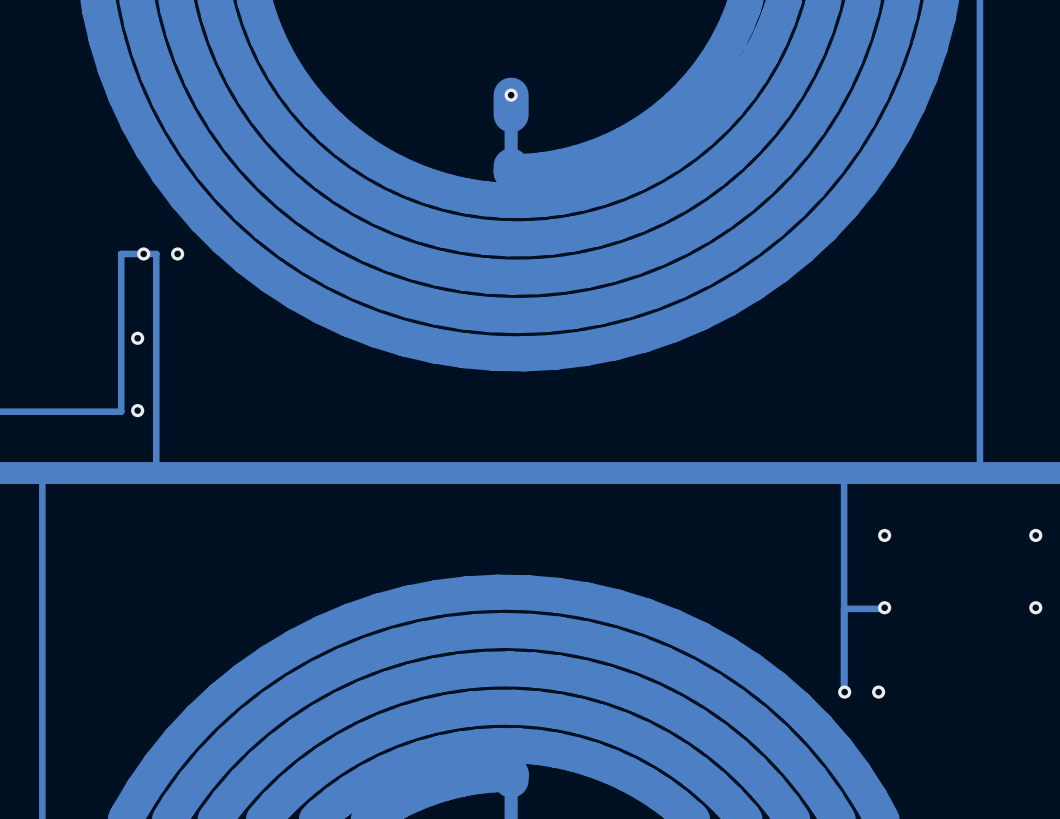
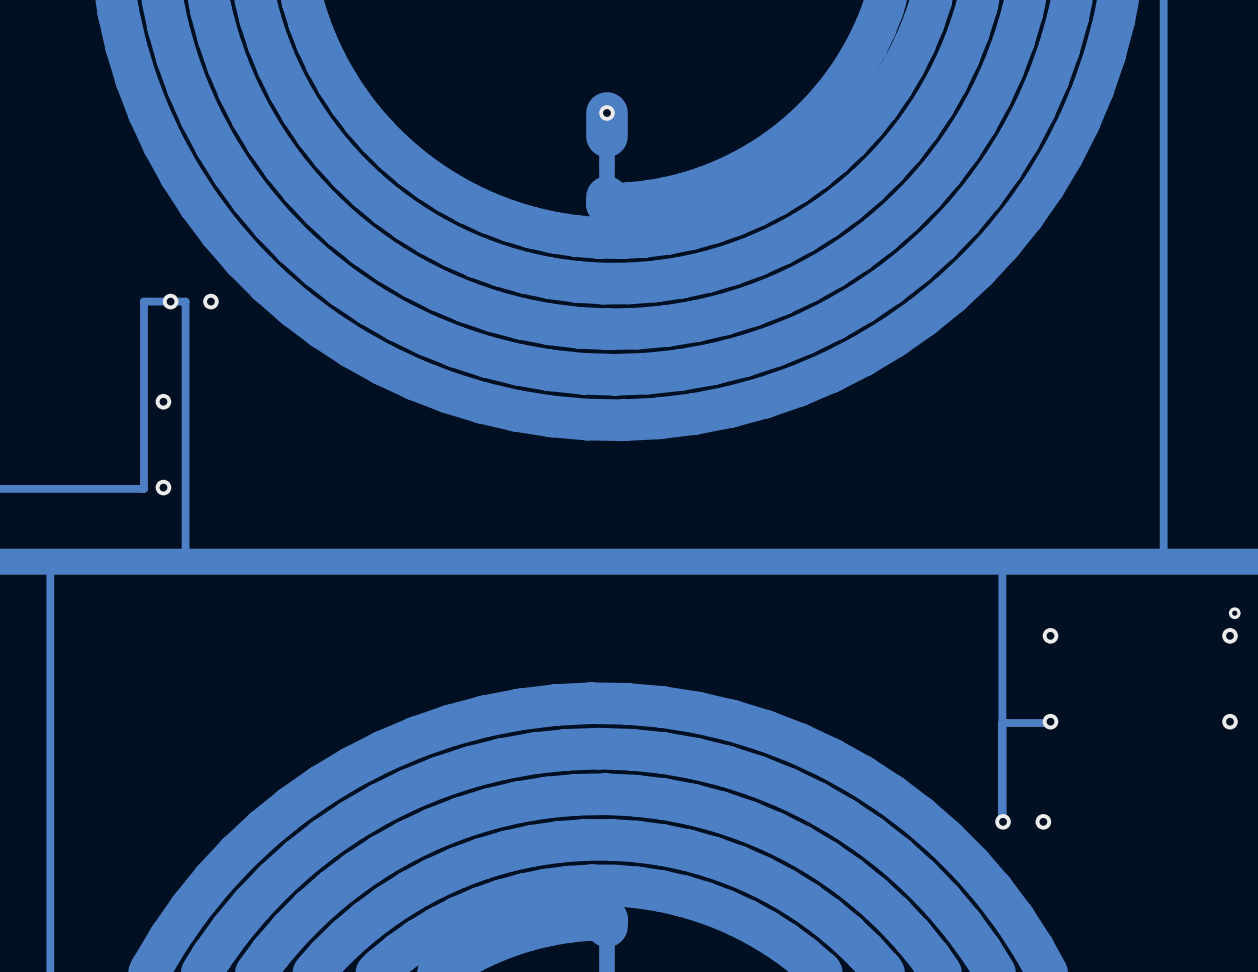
via: none -> (1234, 613)

